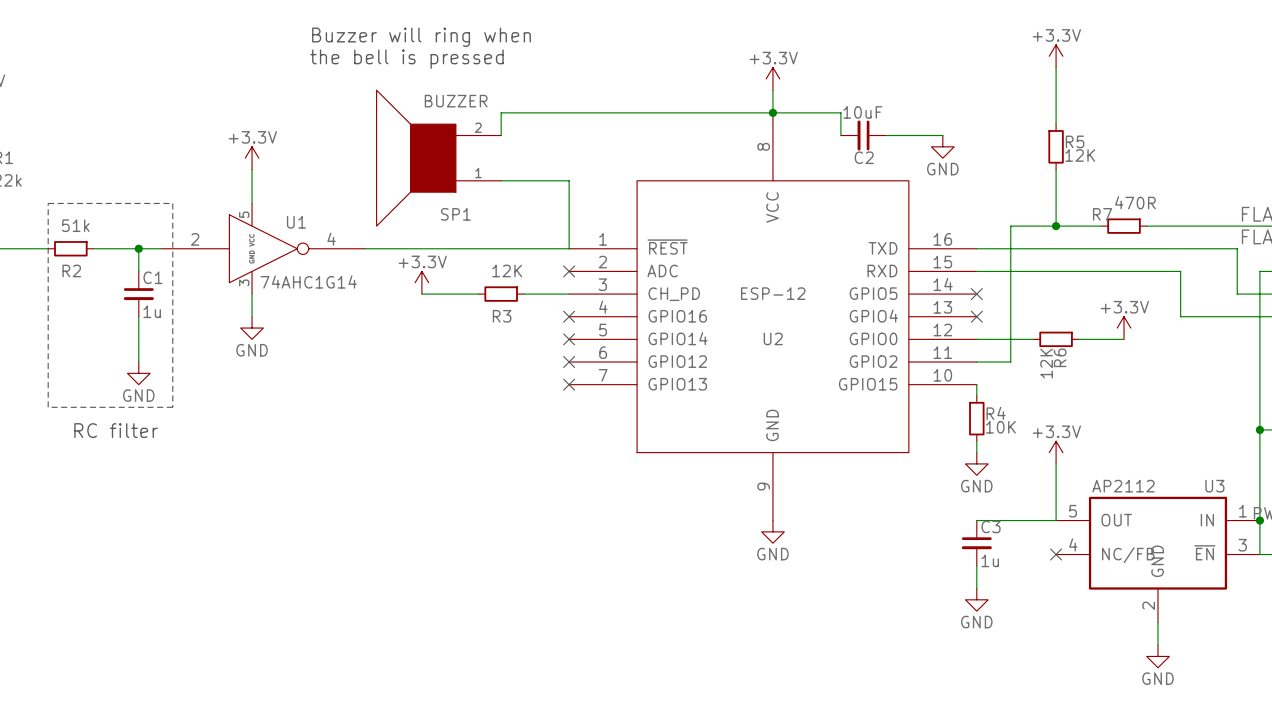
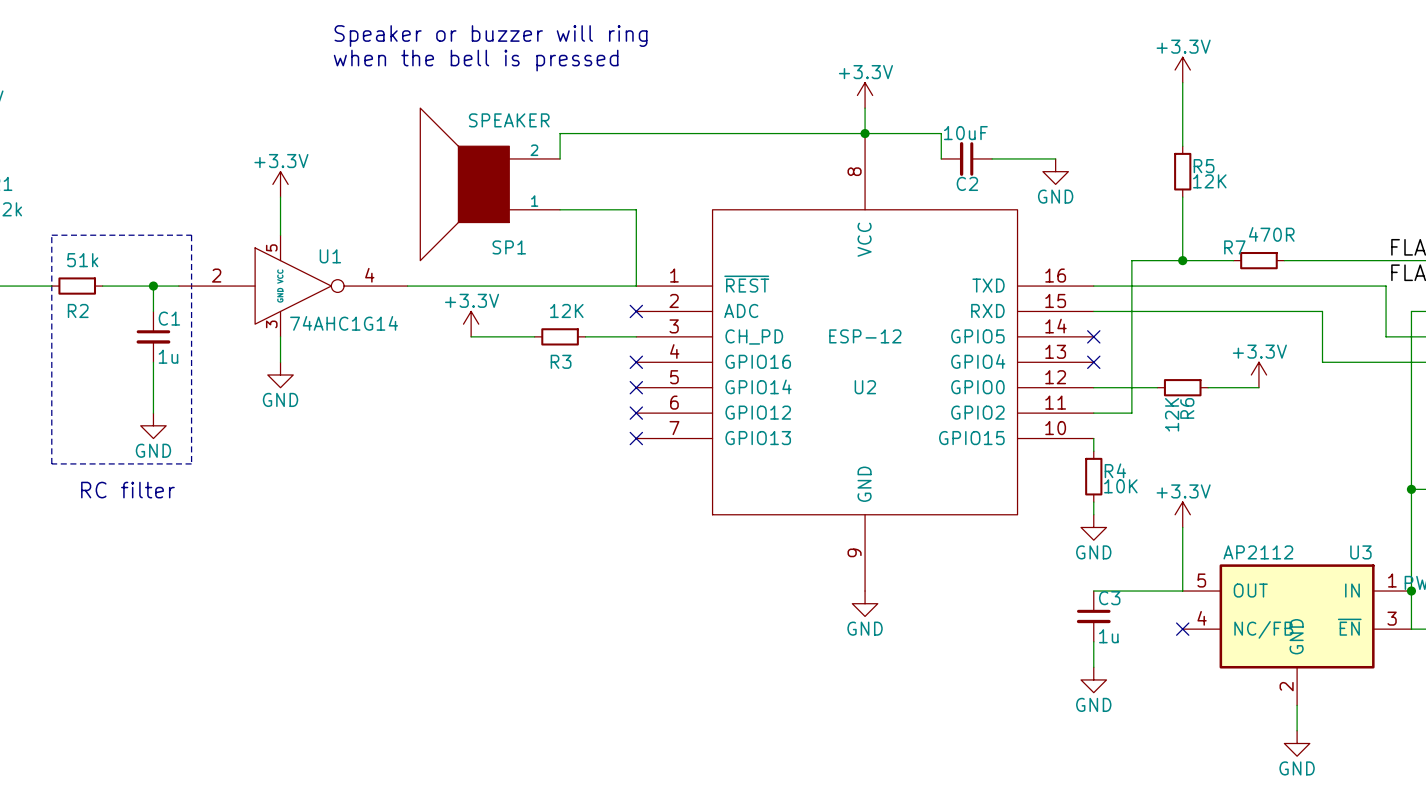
text: Buzzer will ring when (421, 37) -> Speaker or buzzer will ring (491, 36)
text: the bell is pressed (406, 59) -> when the bell is pressed (476, 60)
SP1 value: BUZZER (456, 101) -> SPEAKER (509, 120)

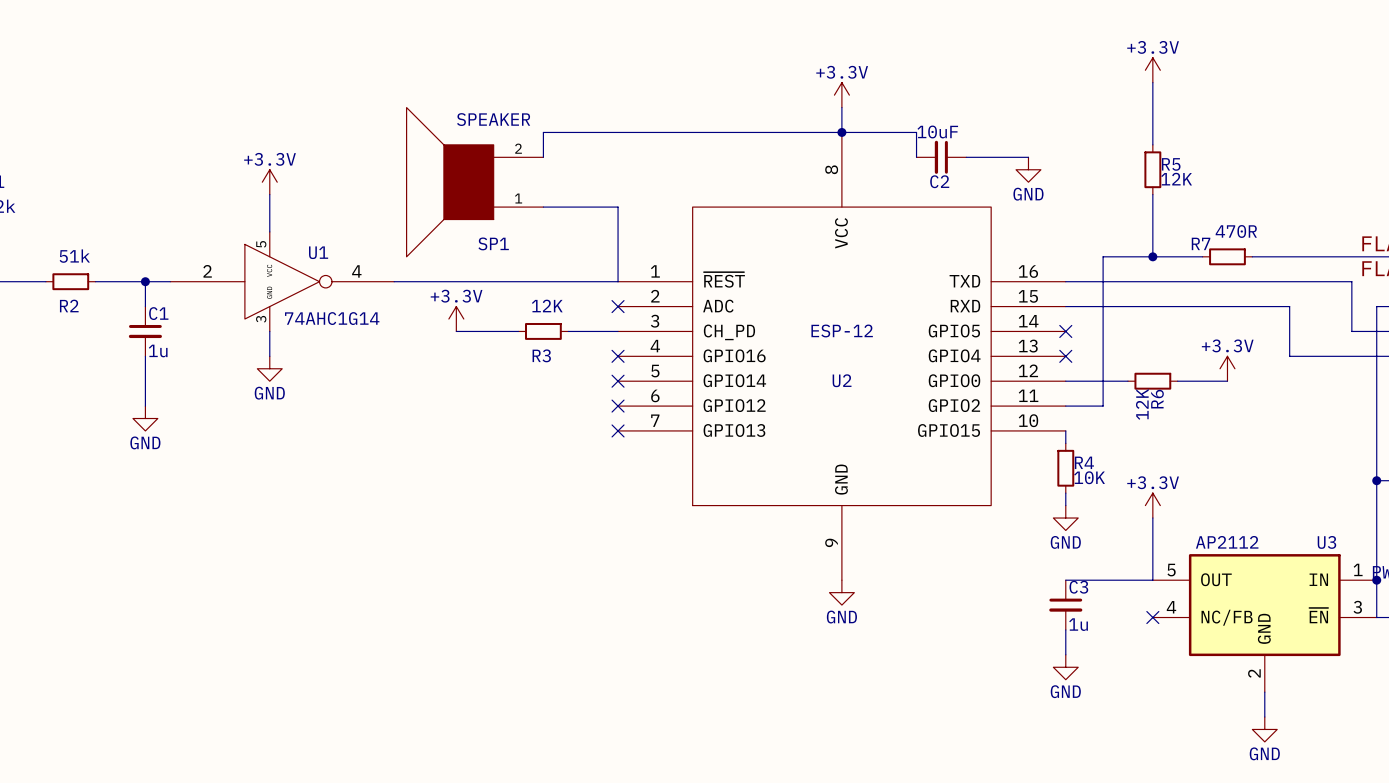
text: Speaker or buzzer will ring (491, 36) -> none
text: when the bell is pressed (476, 60) -> none
line: (51, 235) (191, 235) (191, 463) (51, 463) (51, 235) -> none
text: RC filter (127, 490) -> none

